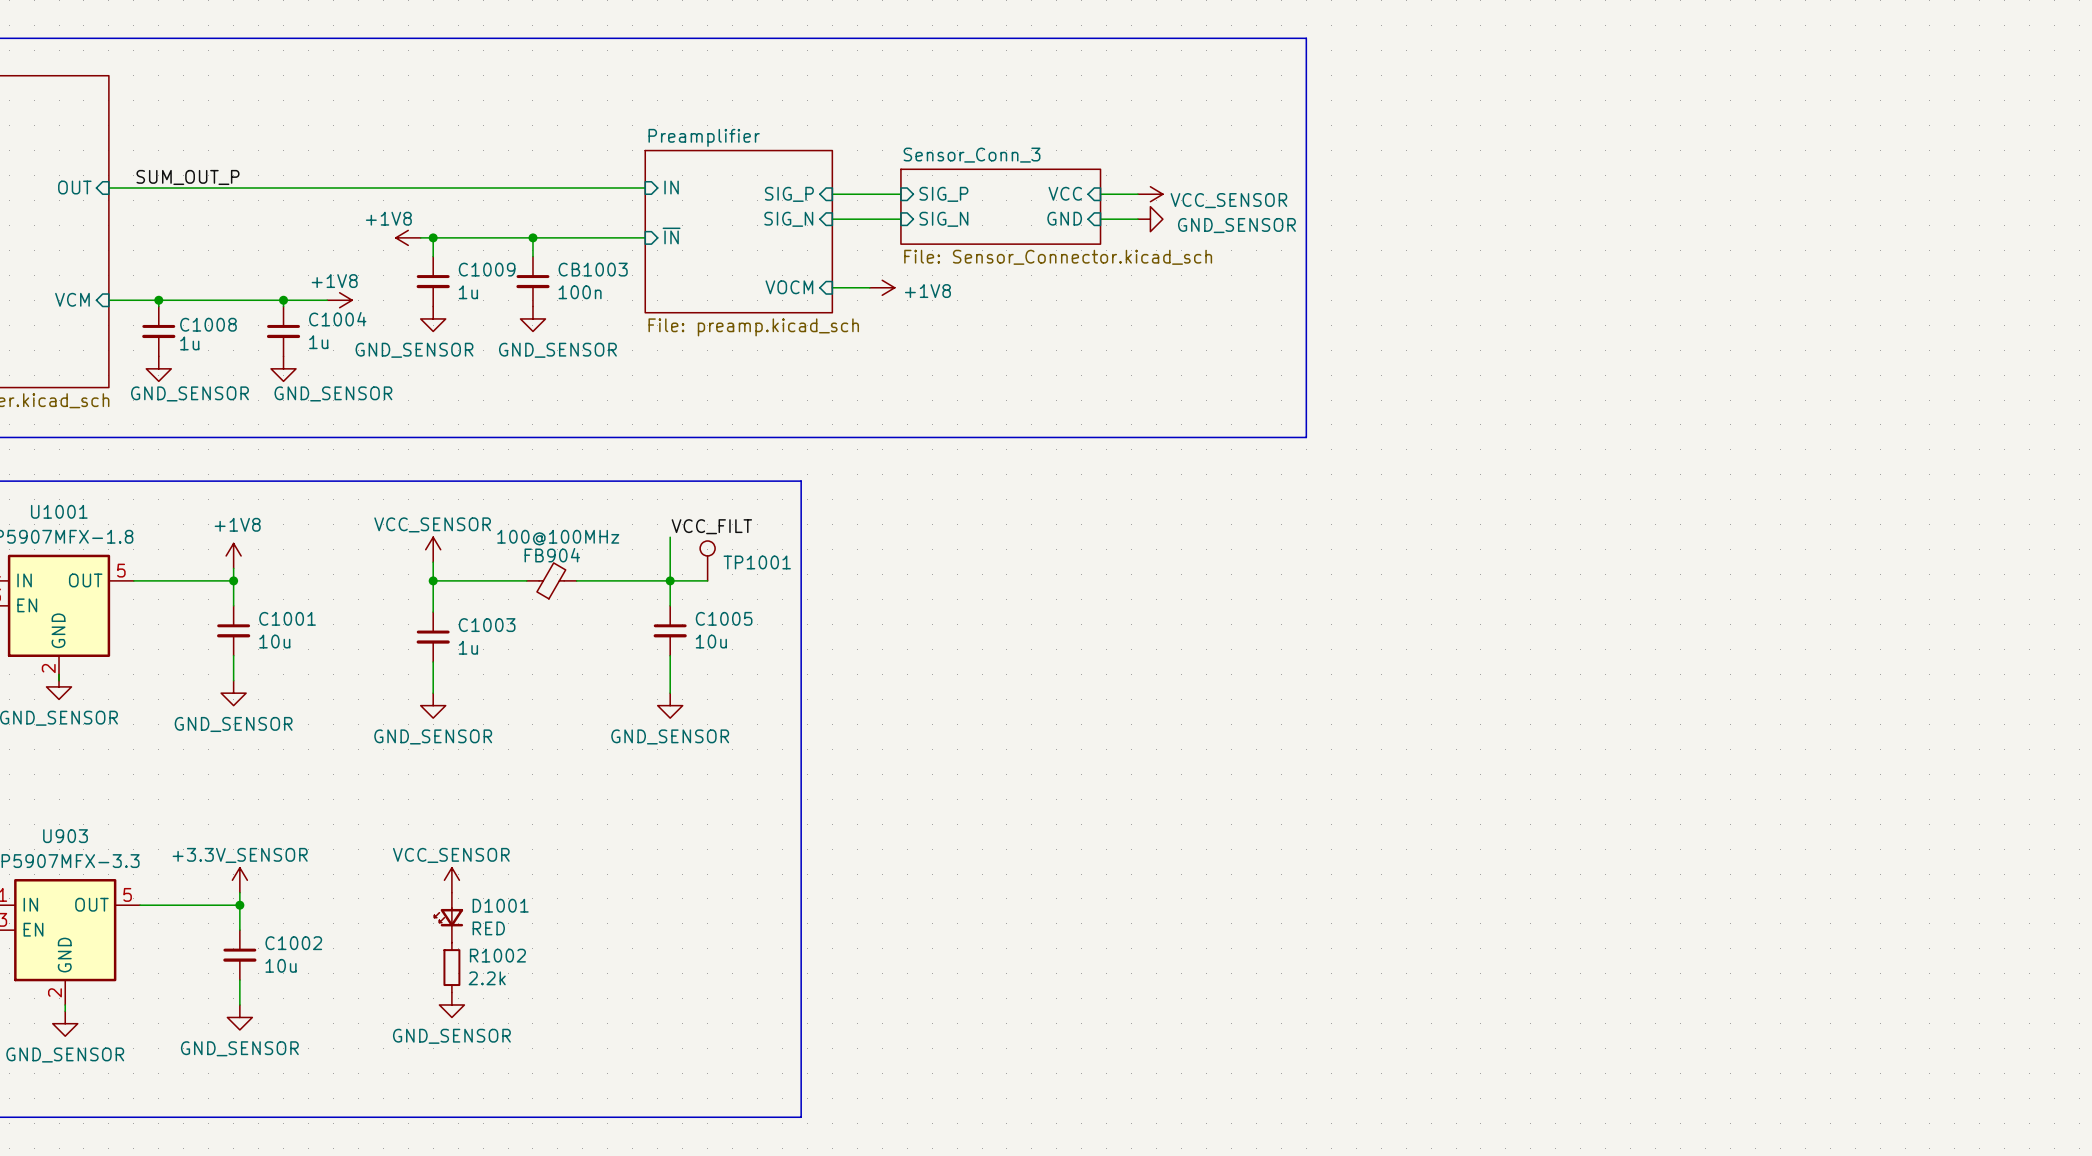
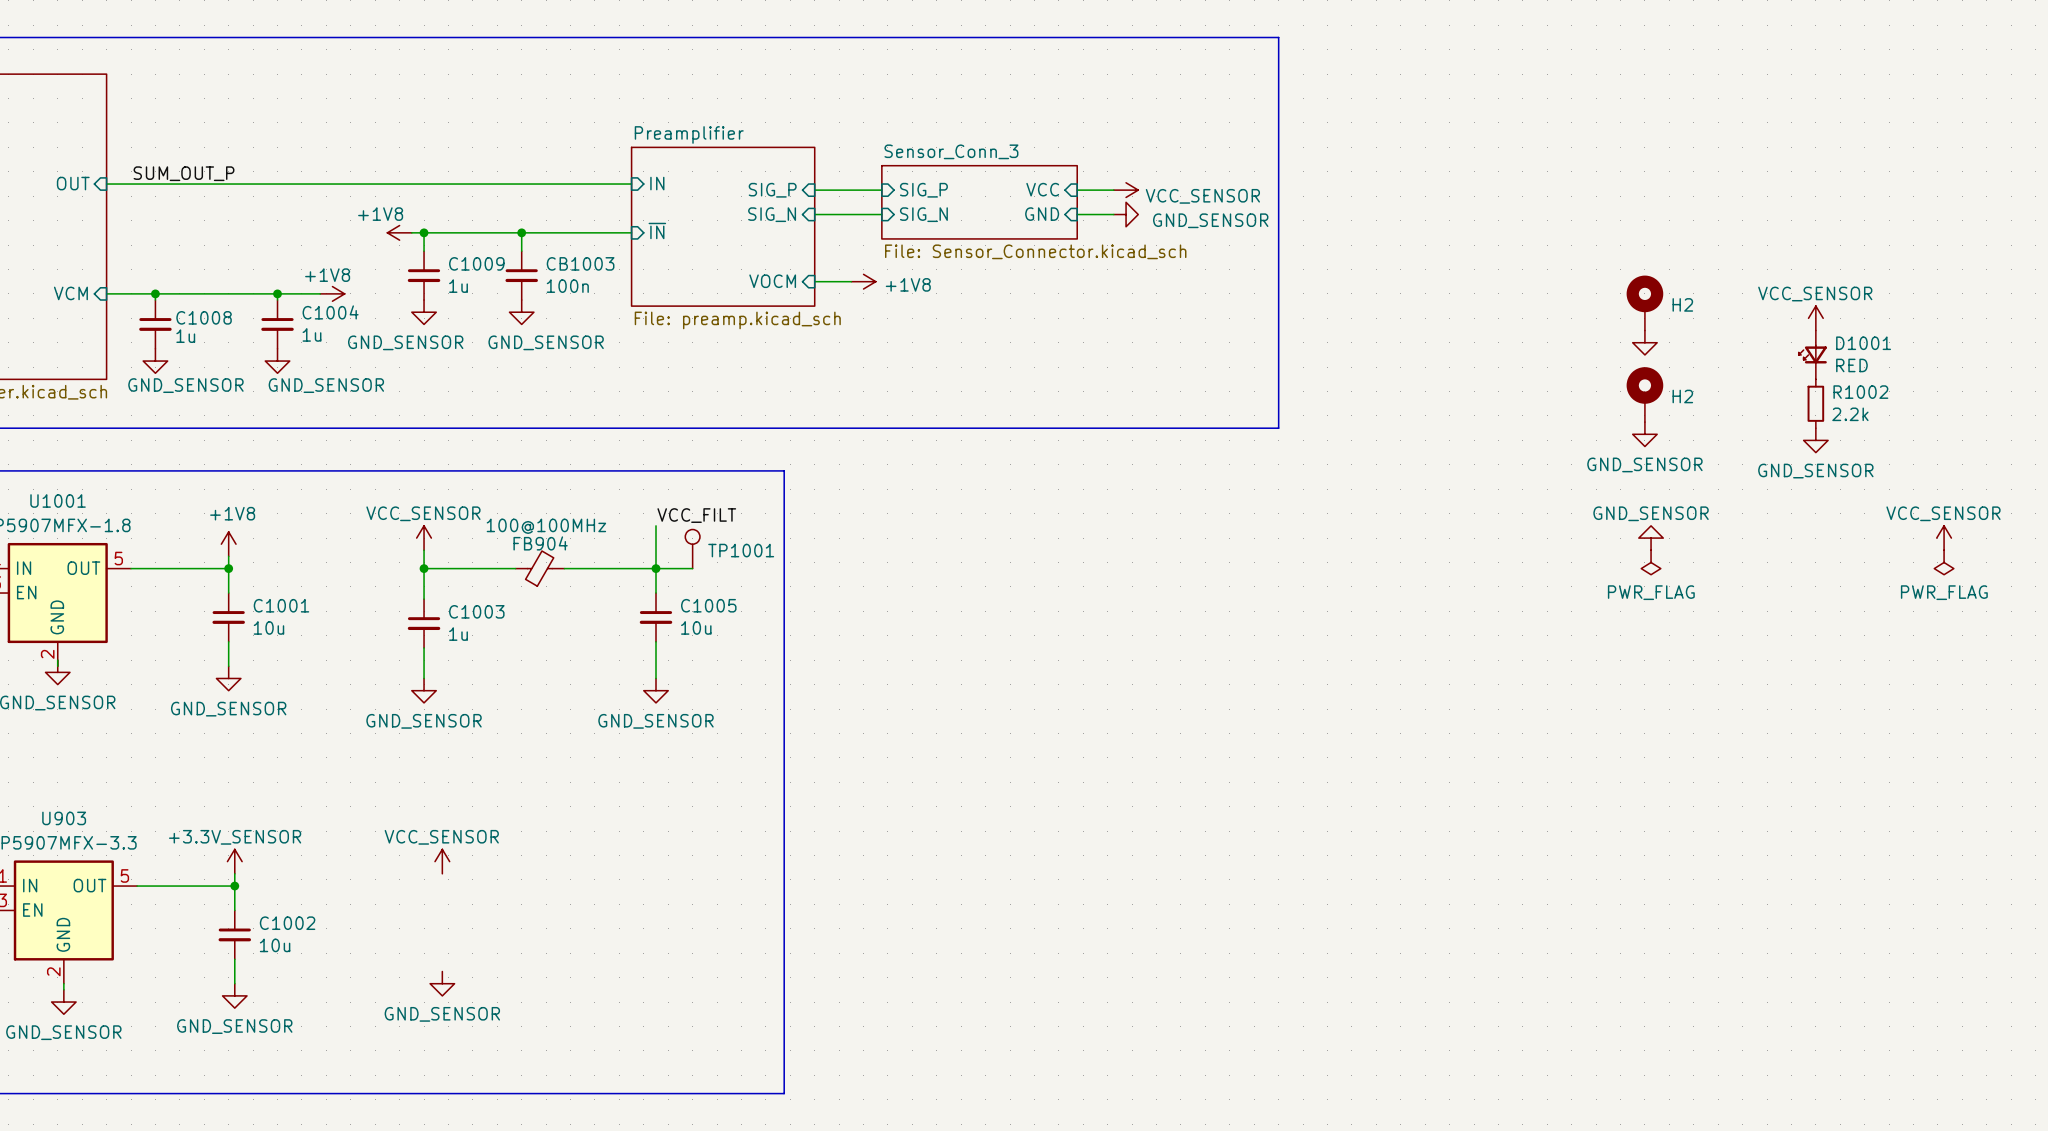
H2: none -> (1644, 303)
power symbol: none -> VCC_SENSOR (1815, 318)
power symbol: none -> (1644, 342)
H2: none -> (1644, 394)
power symbol: none -> GND_SENSOR (1644, 434)
power symbol: none -> GND_SENSOR (1815, 440)
power symbol: none -> GND_SENSOR (1651, 538)
power symbol: none -> VCC_SENSOR (1944, 538)
power symbol: none -> PWR_FLAG (1651, 562)
power symbol: none -> PWR_FLAG (1944, 562)
D1001 position: (448, 917) -> (1812, 354)
R1002 position: (451, 967) -> (1815, 403)

